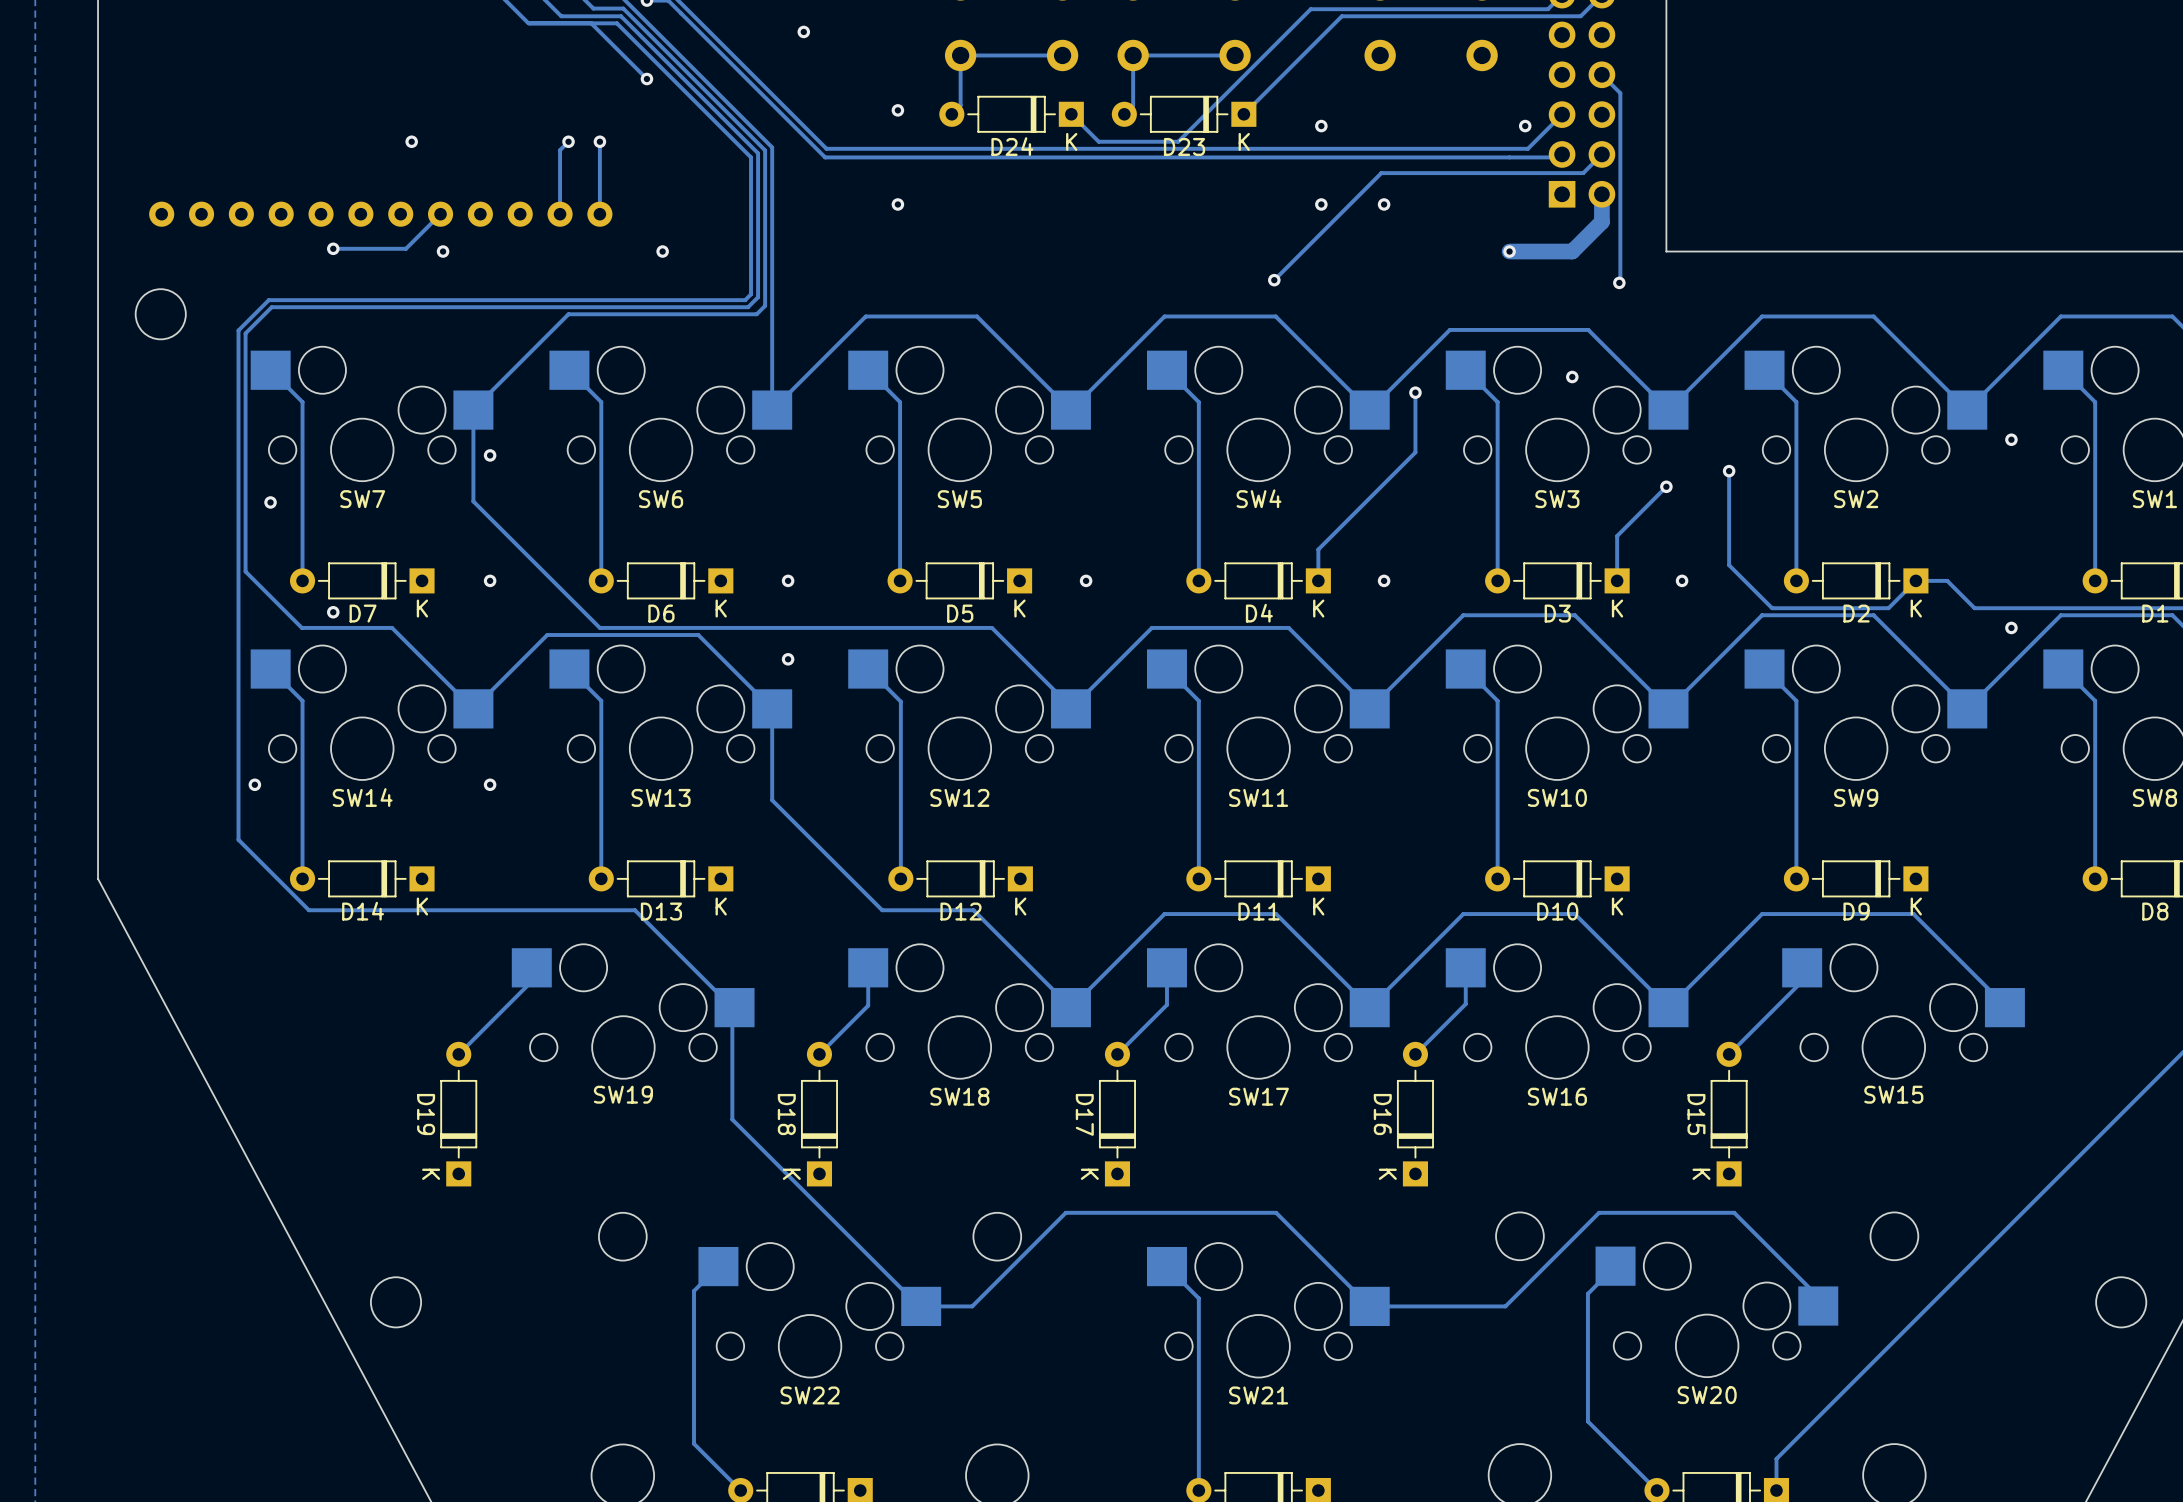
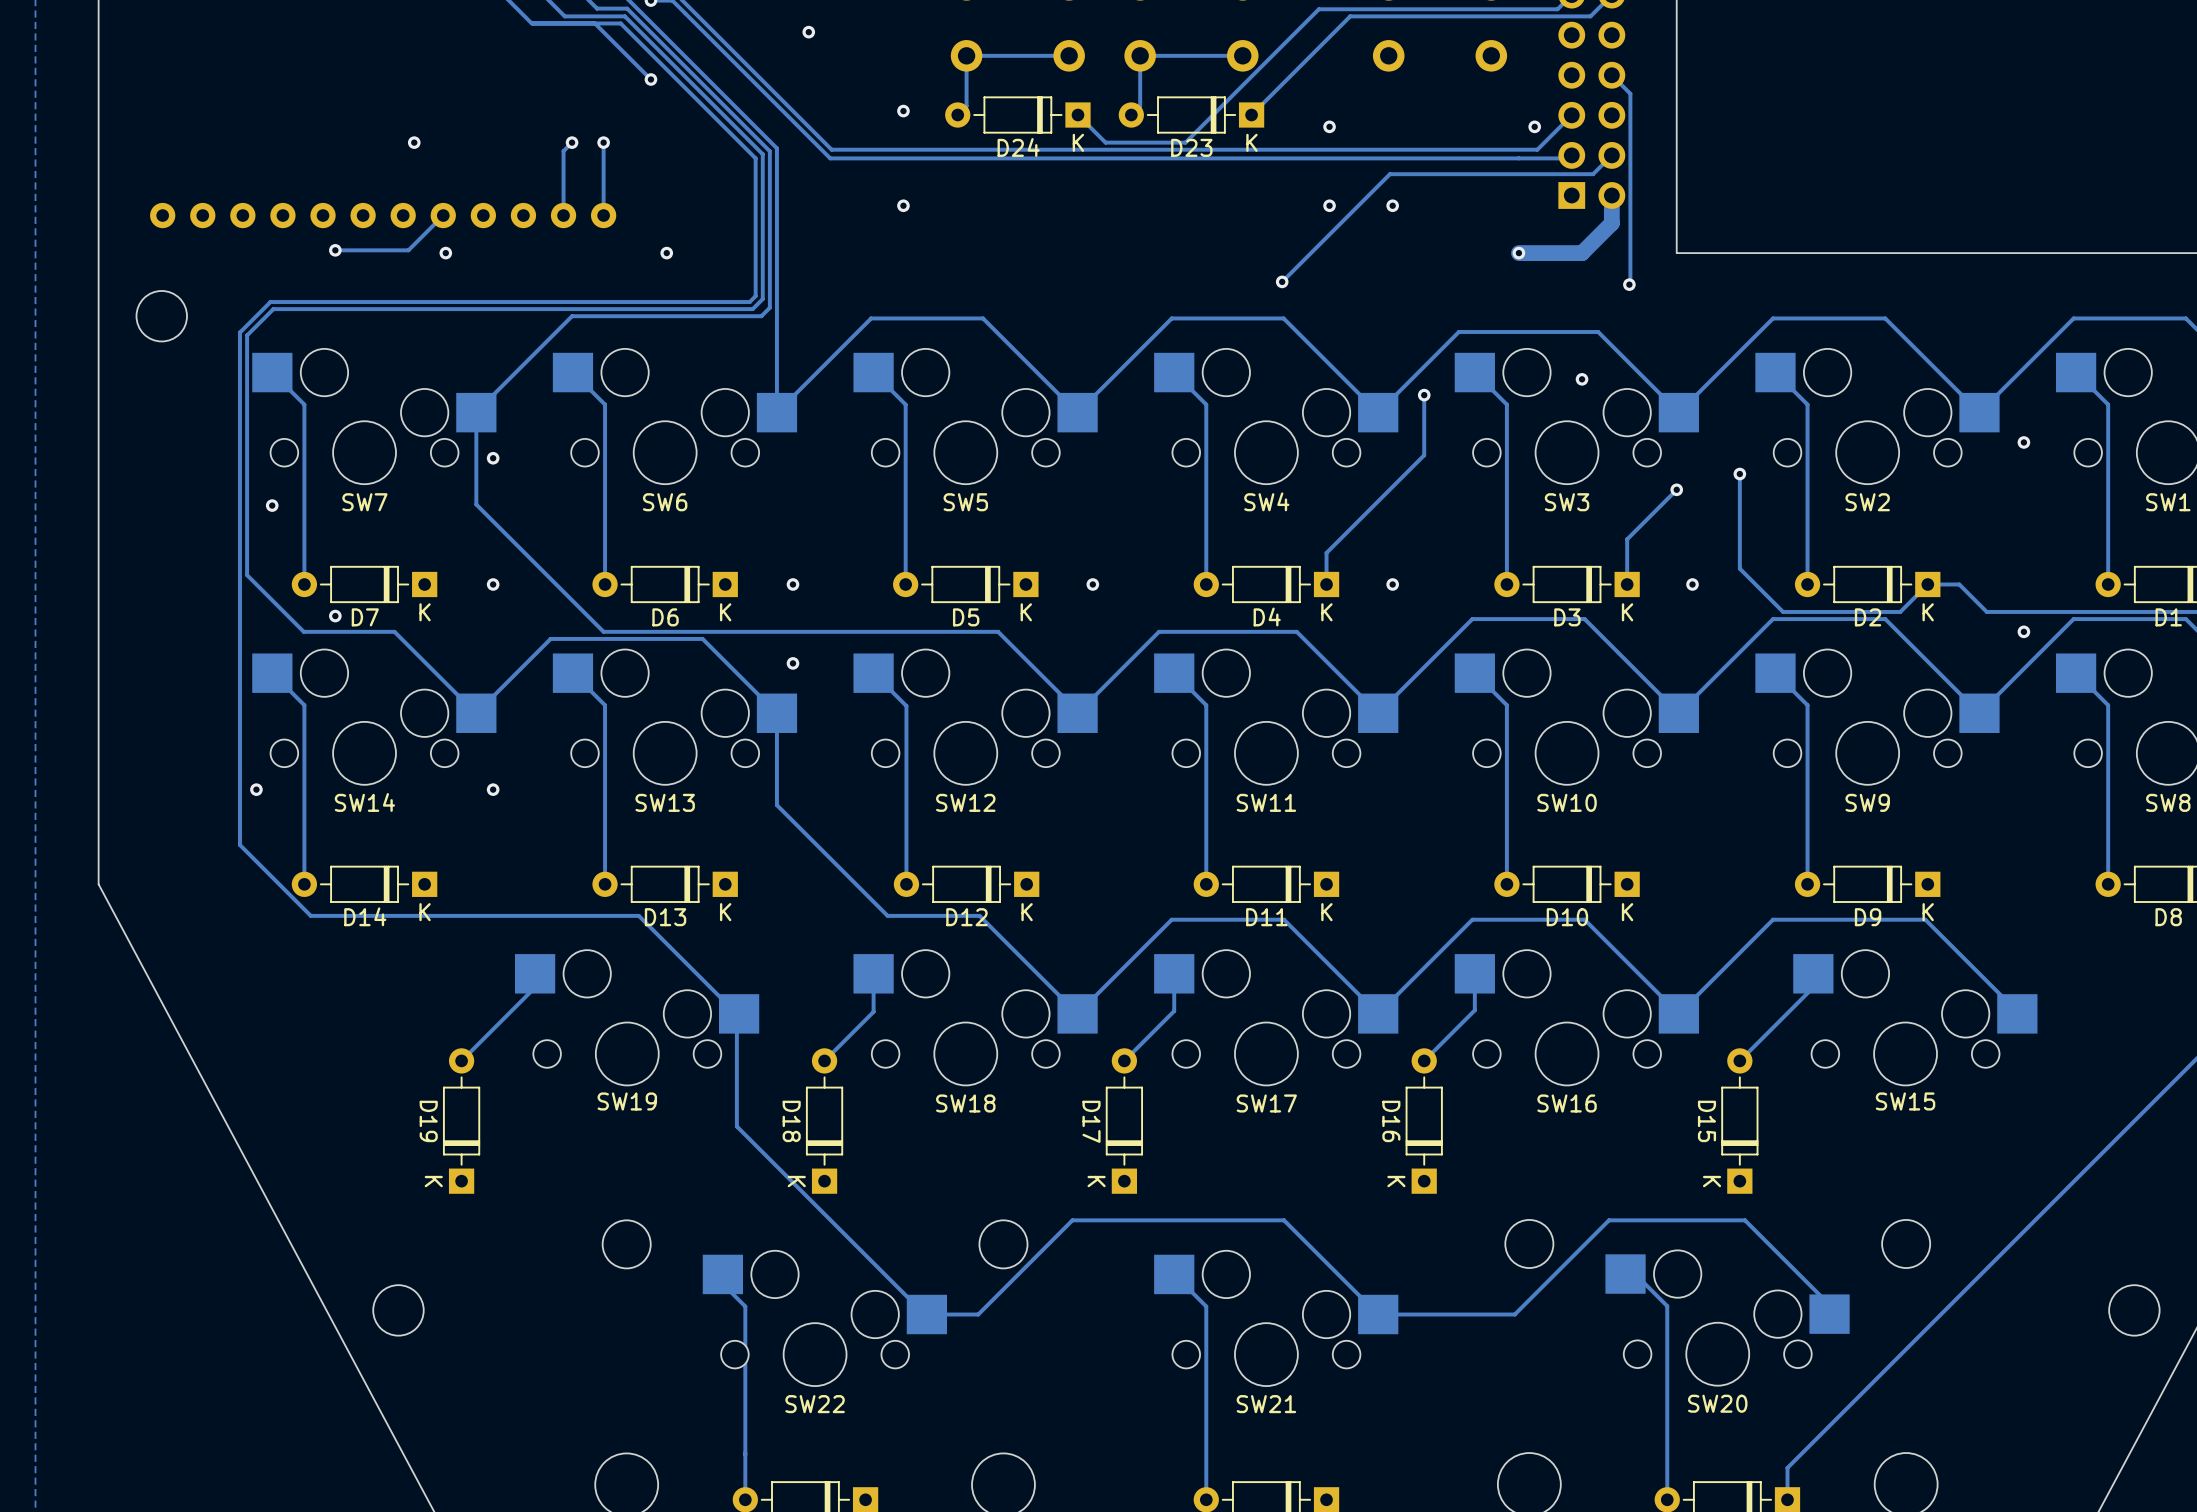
track: (718, 1266) (694, 1291) (694, 1443) (740, 1490) -> (713, 1274) (745, 1306) (745, 1499)
track: (1615, 1266) (1587, 1293) (1587, 1421) (1656, 1490) -> (1635, 1274) (1667, 1306) (1667, 1499)

